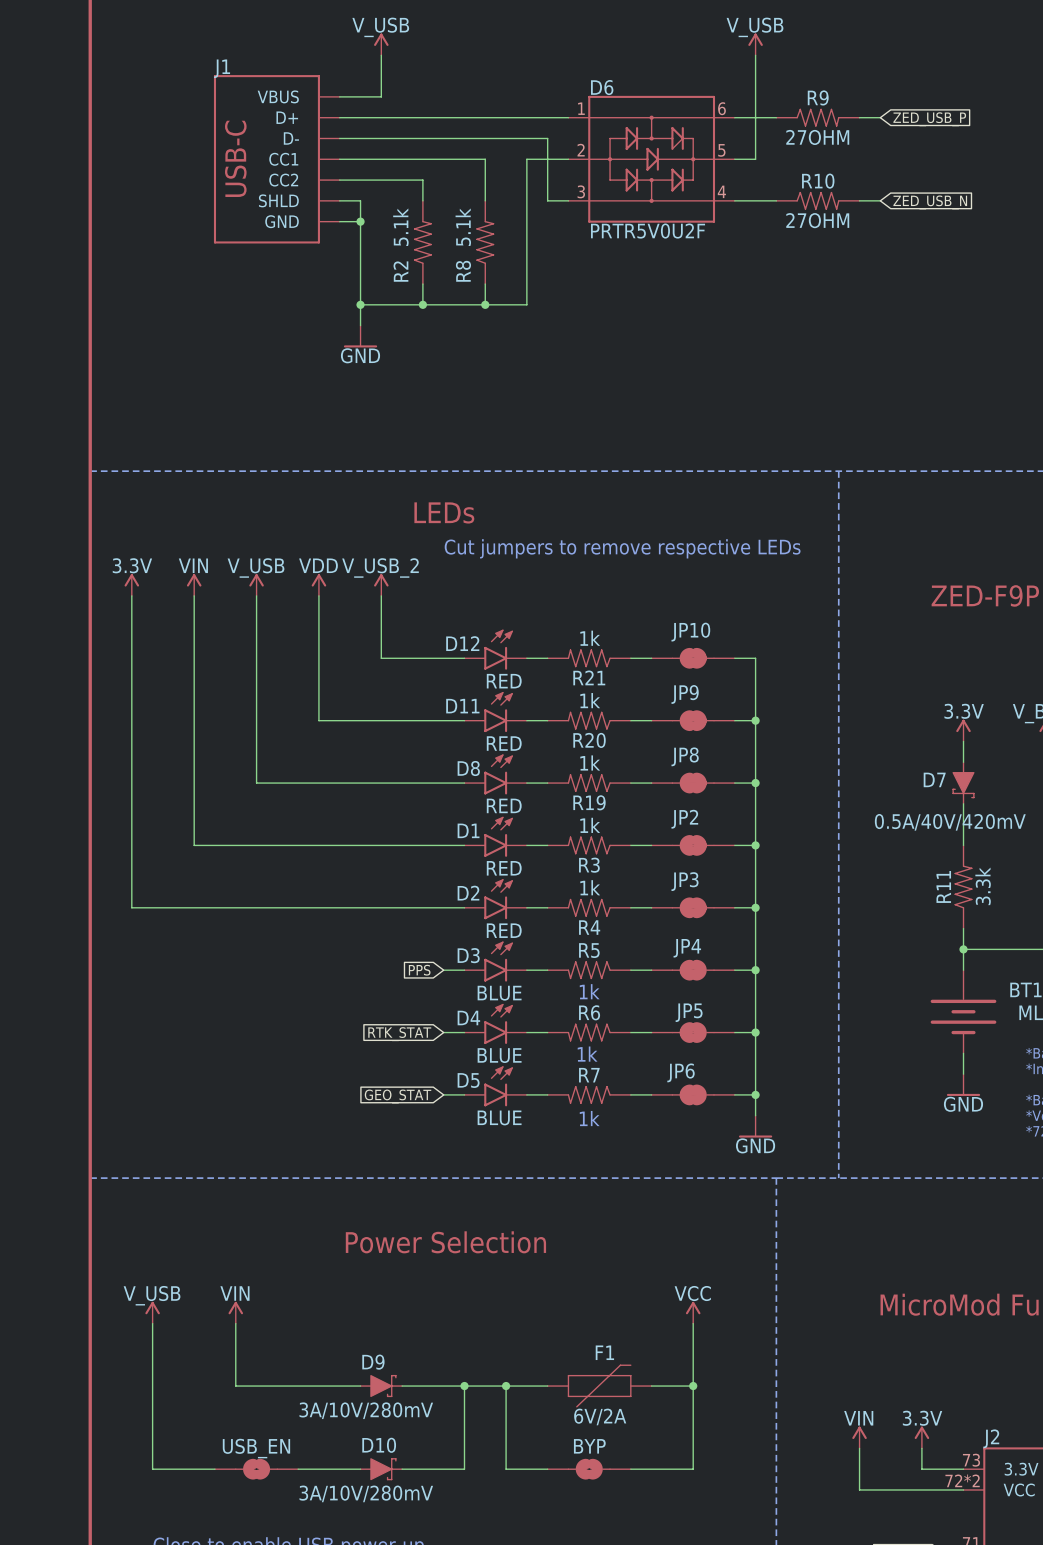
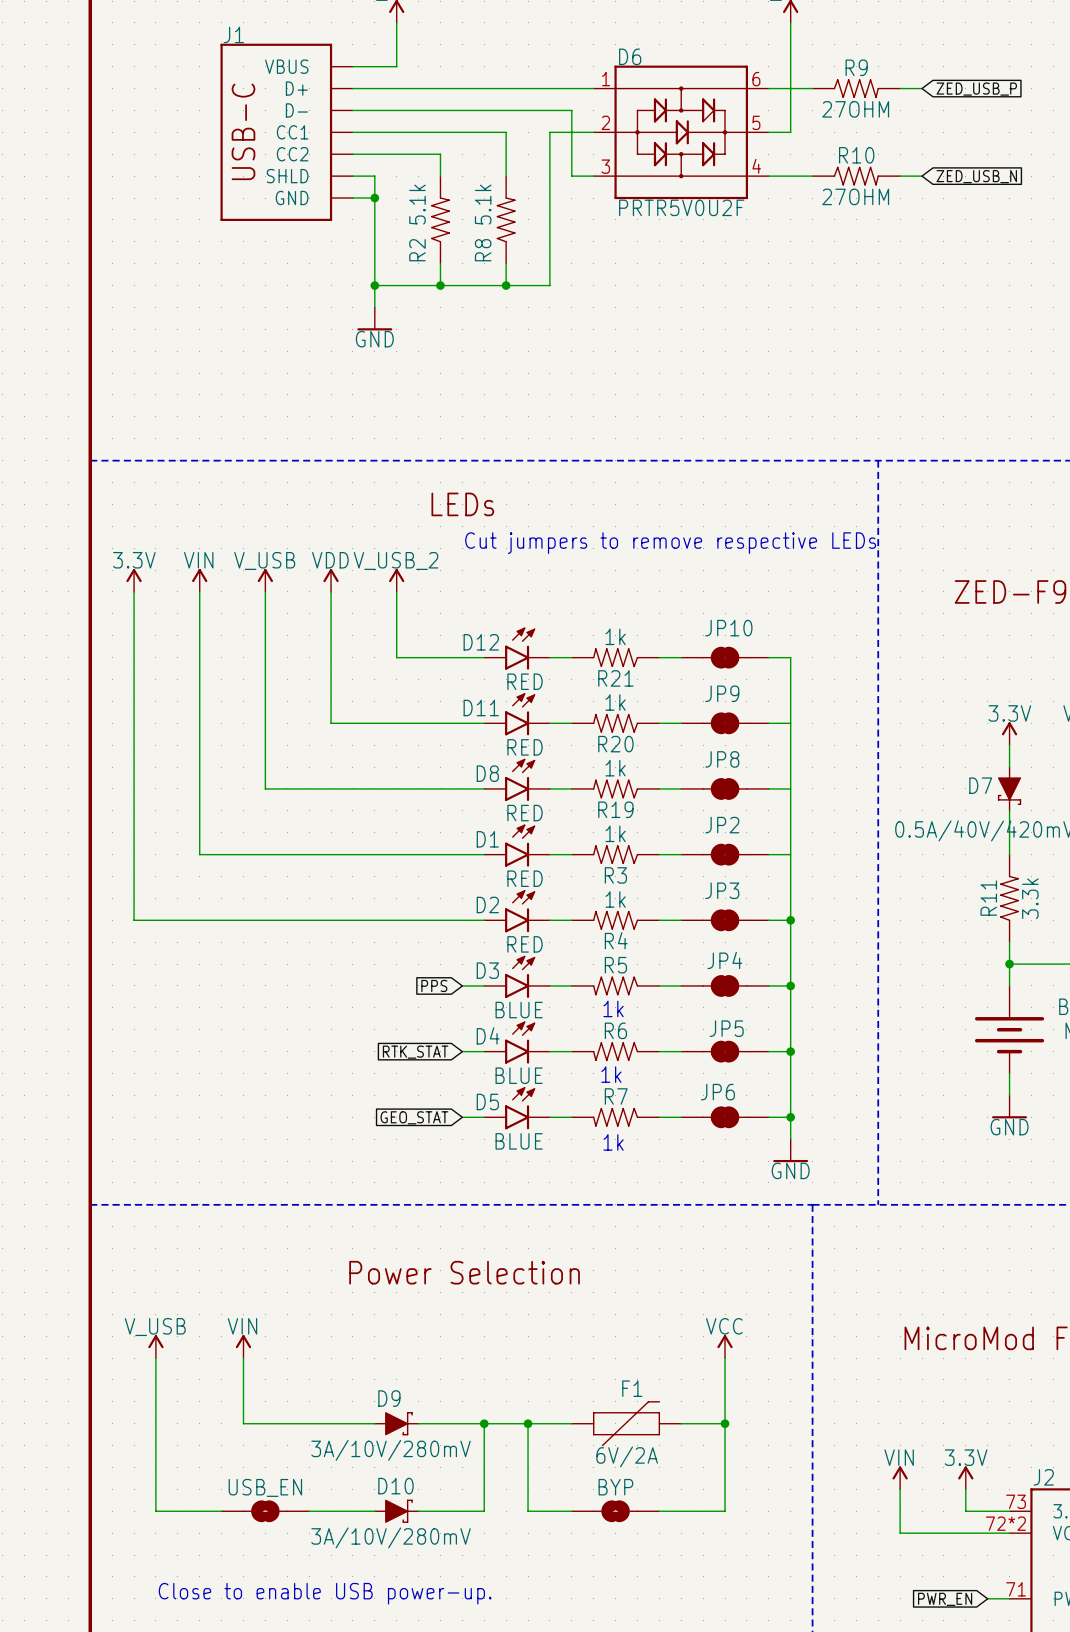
junction: (755, 720) -> none
junction: (755, 783) -> none
junction: (755, 845) -> none

